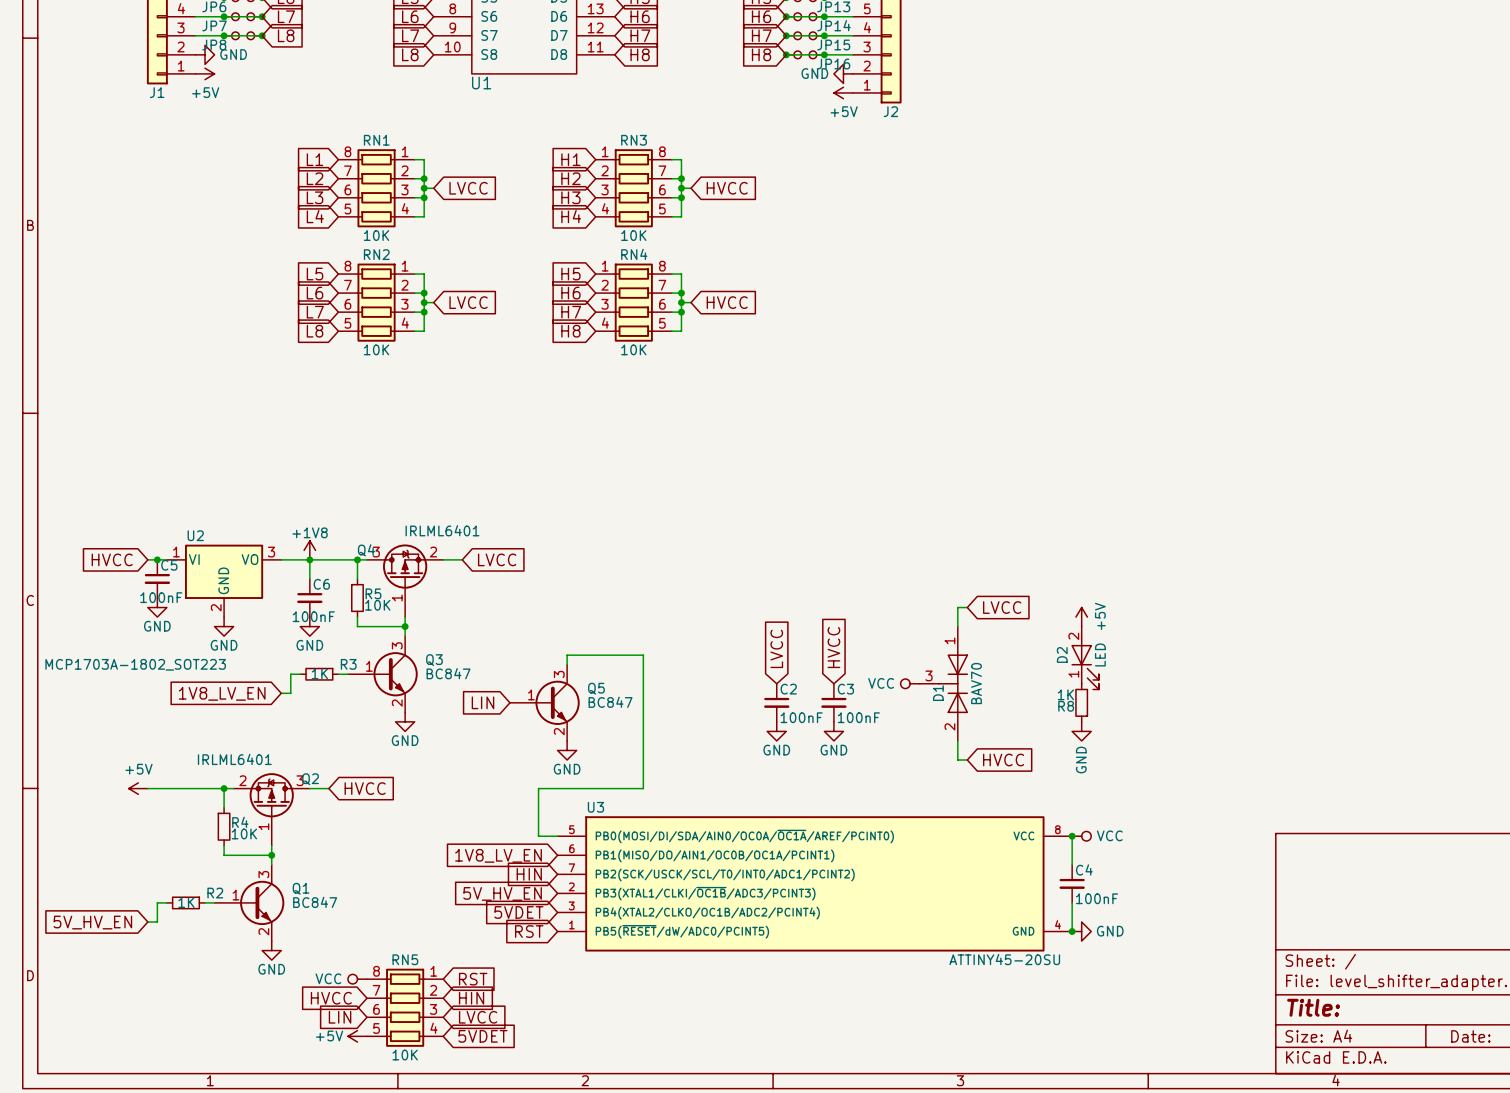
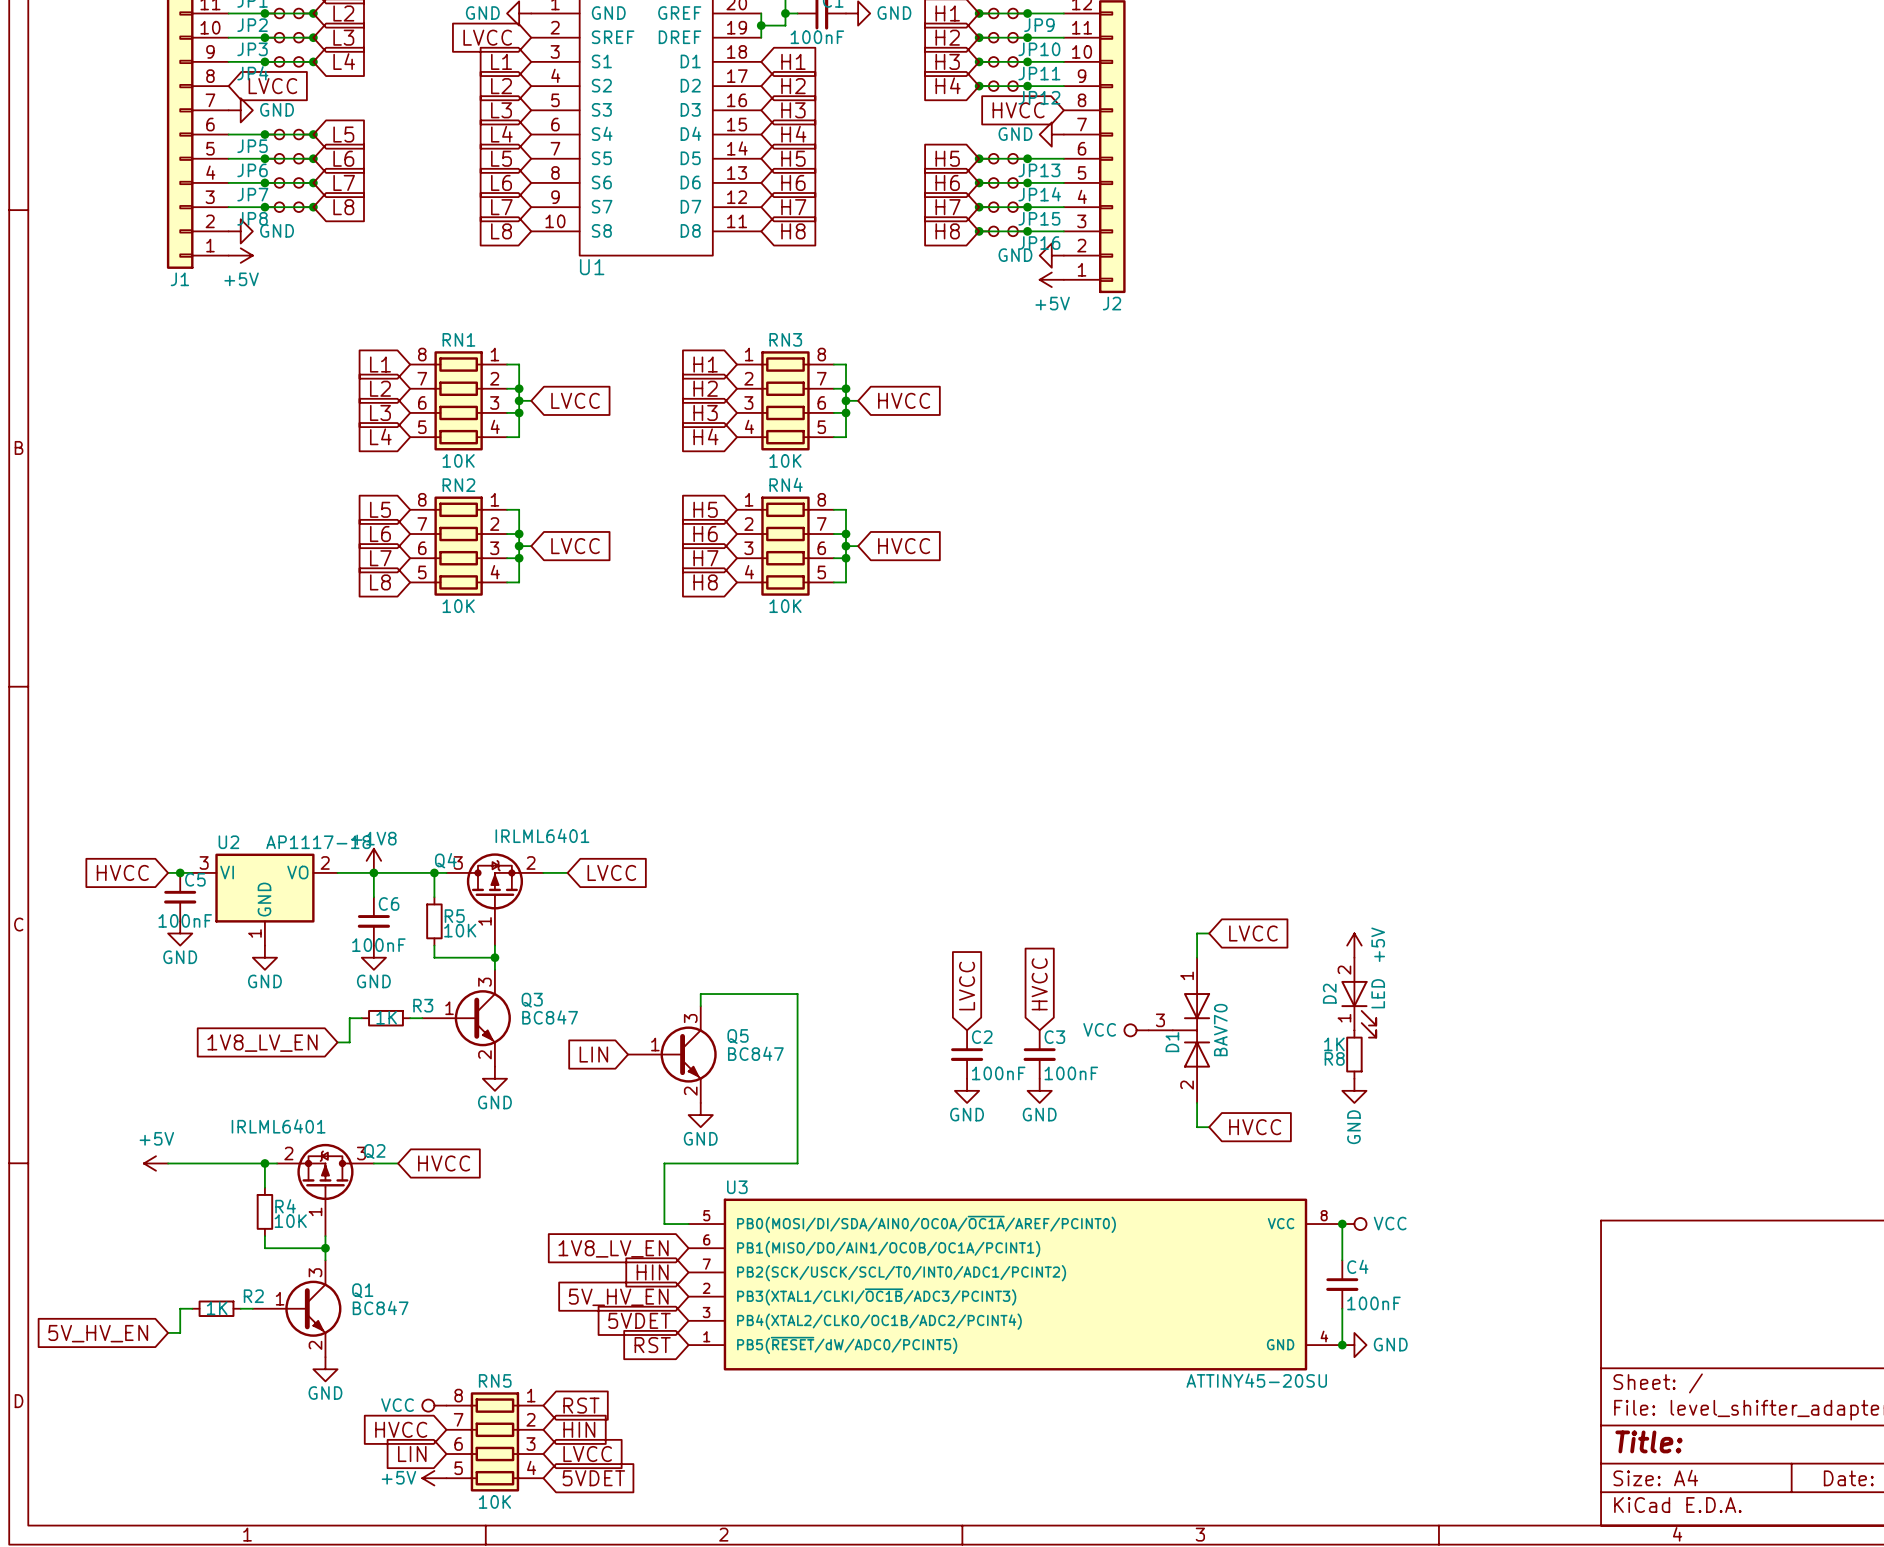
U2 pin number: 1 (176, 552) -> 3 (204, 862)
U2 pin number: 3 (271, 552) -> 2 (325, 862)
U2 pin number: 2 (216, 607) -> 1 (254, 933)
U2 value: MCP1703A-1802_SOT223 (135, 664) -> AP1117-18 (318, 842)

